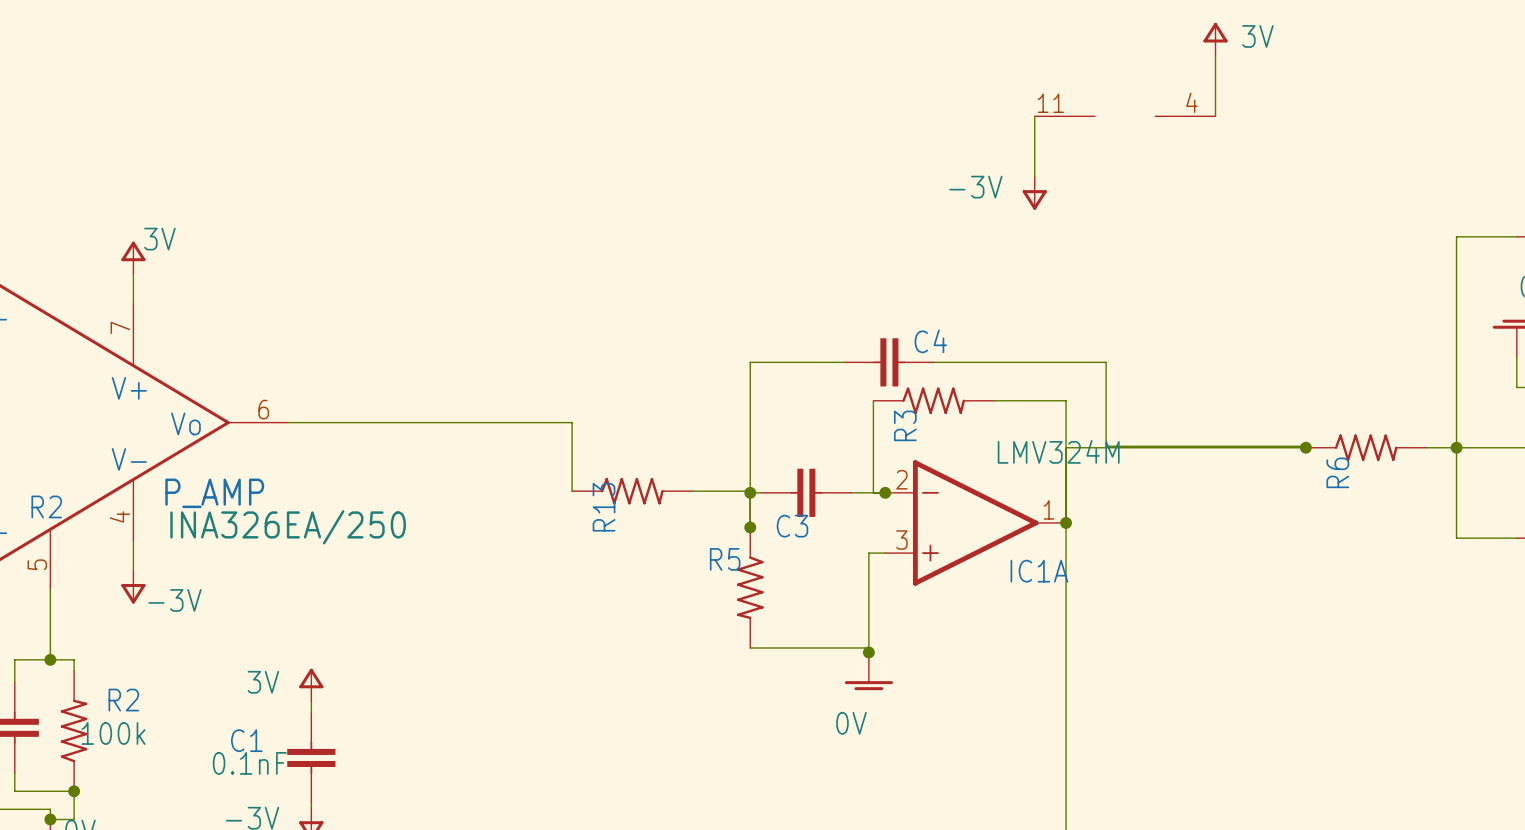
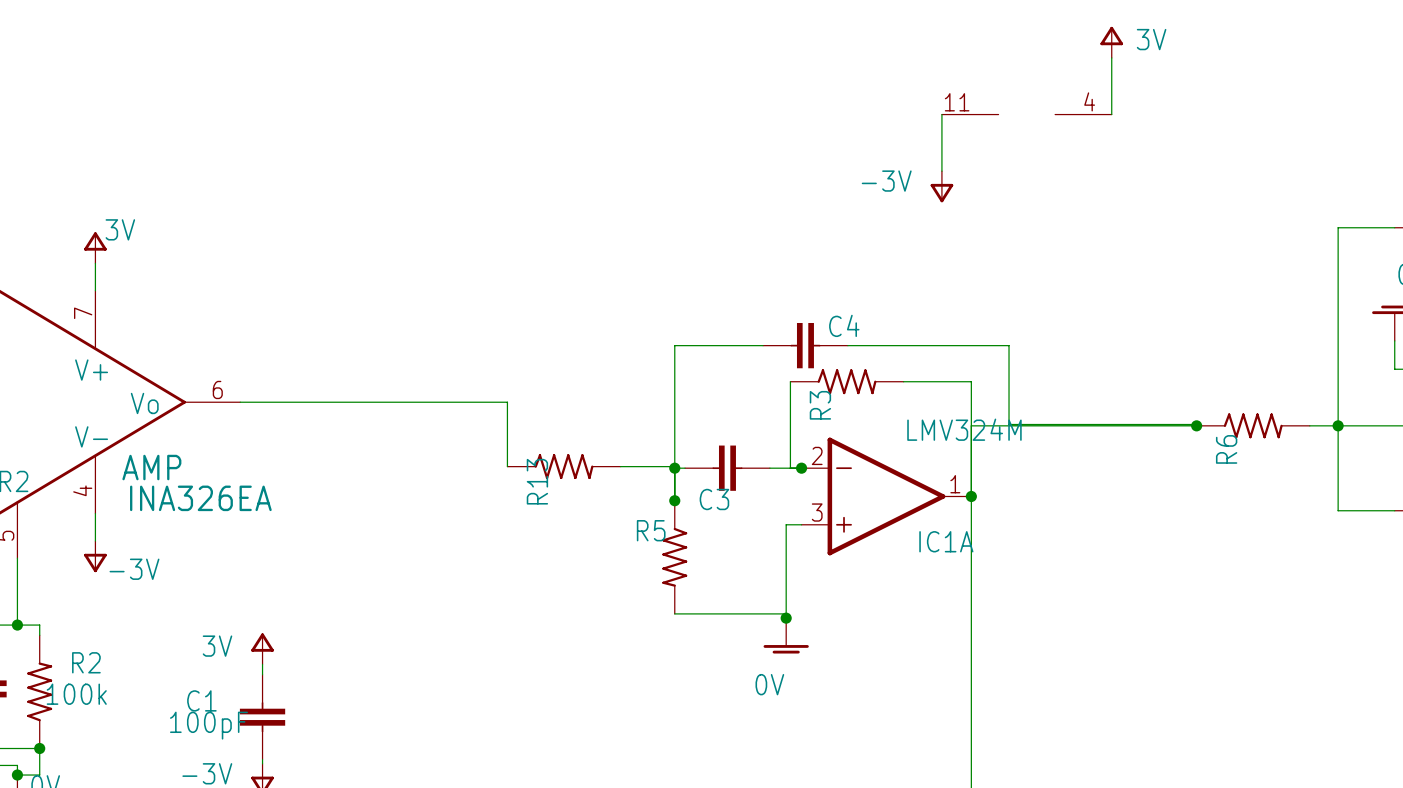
P_AMP name: P_AMP (214, 493) -> AMP (151, 467)
P_AMP value: INA326EA/250 (288, 527) -> INA326EA (200, 498)
C1 value: 0.1nF (249, 763) -> 100pF (208, 725)

